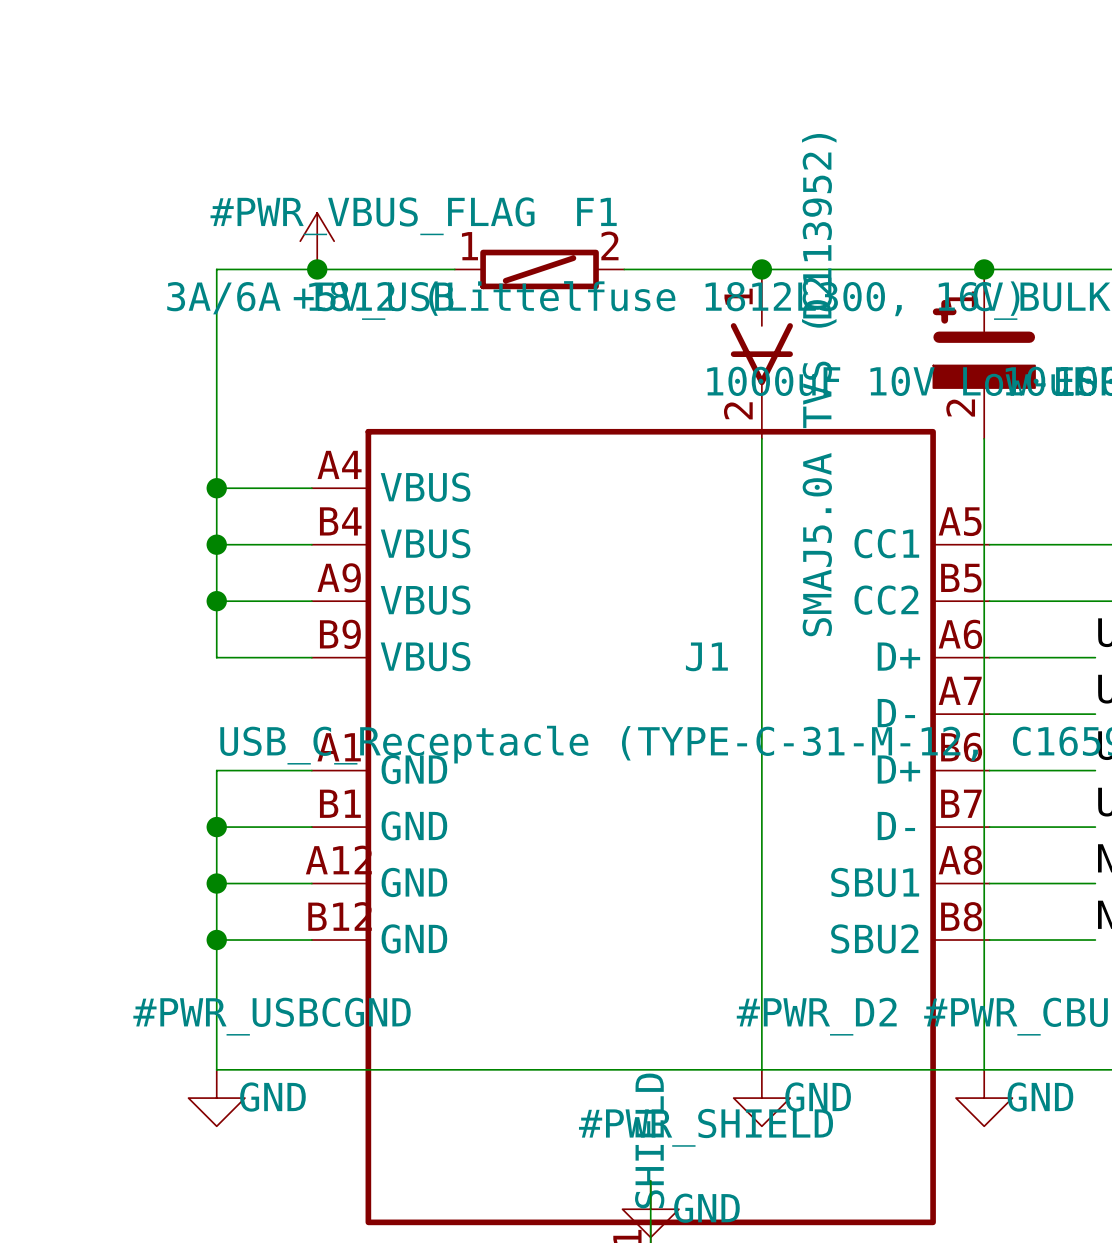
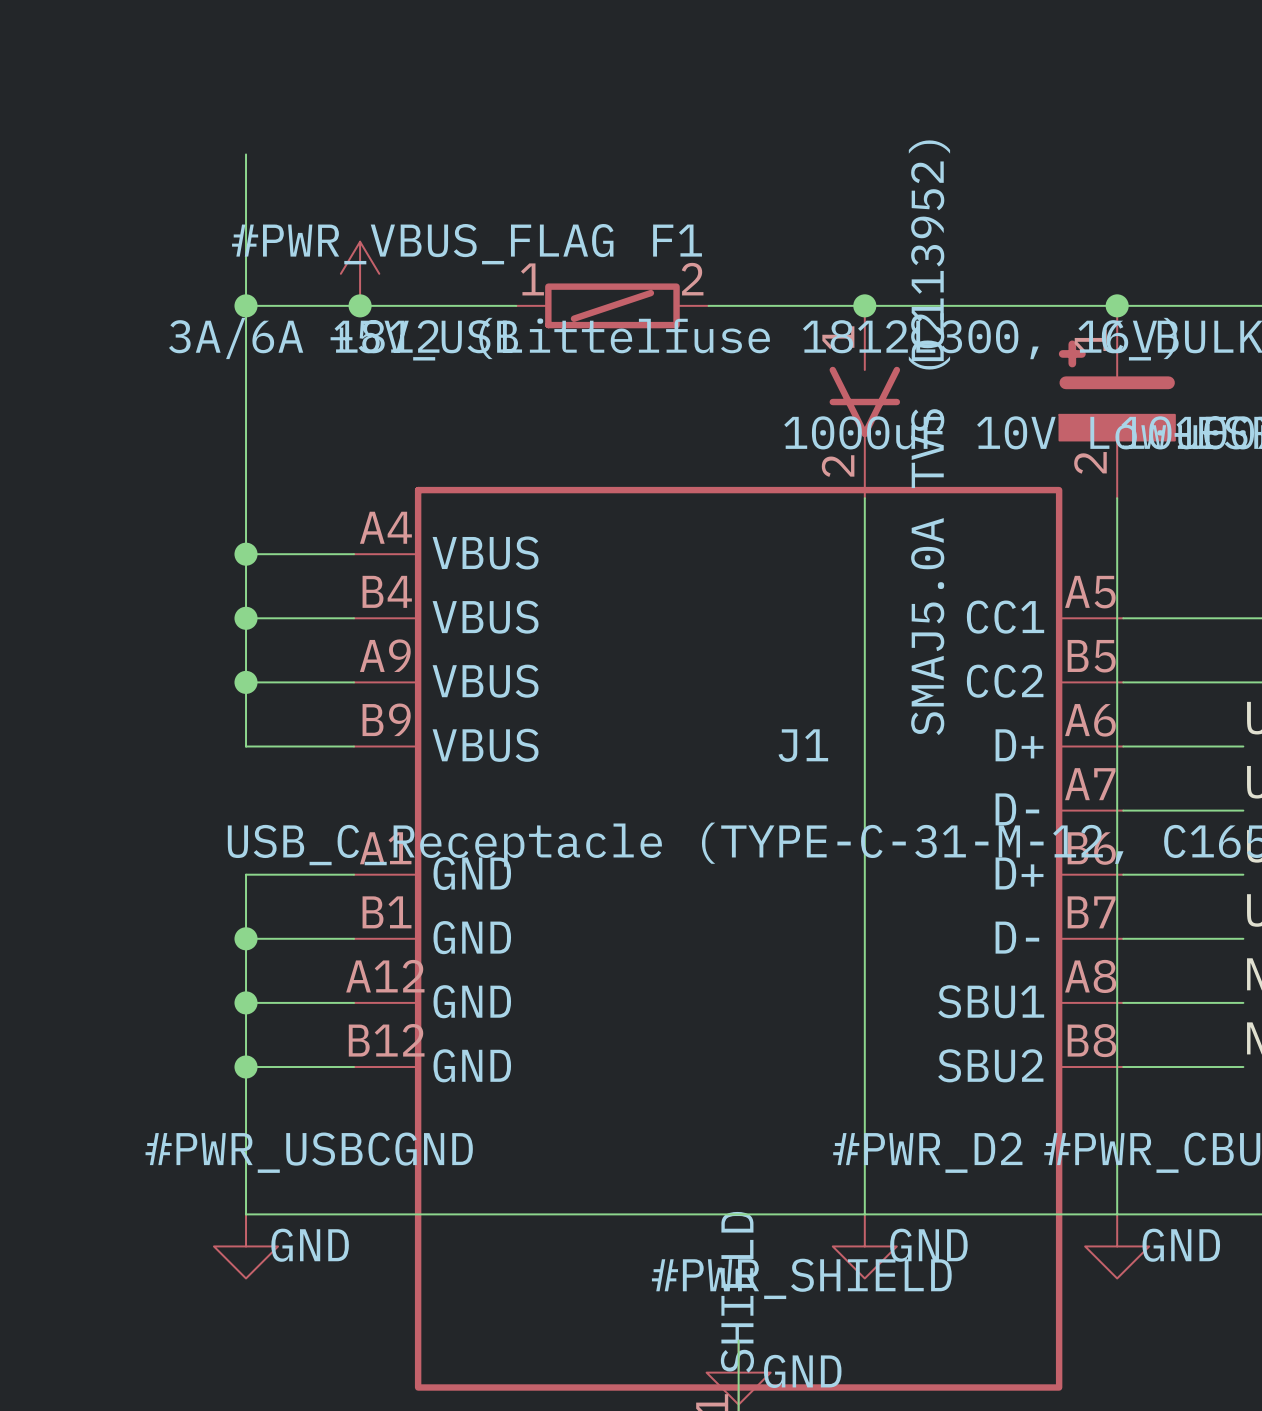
wire: none -> (246, 154) (246, 305)
junction: none -> (246, 305)

